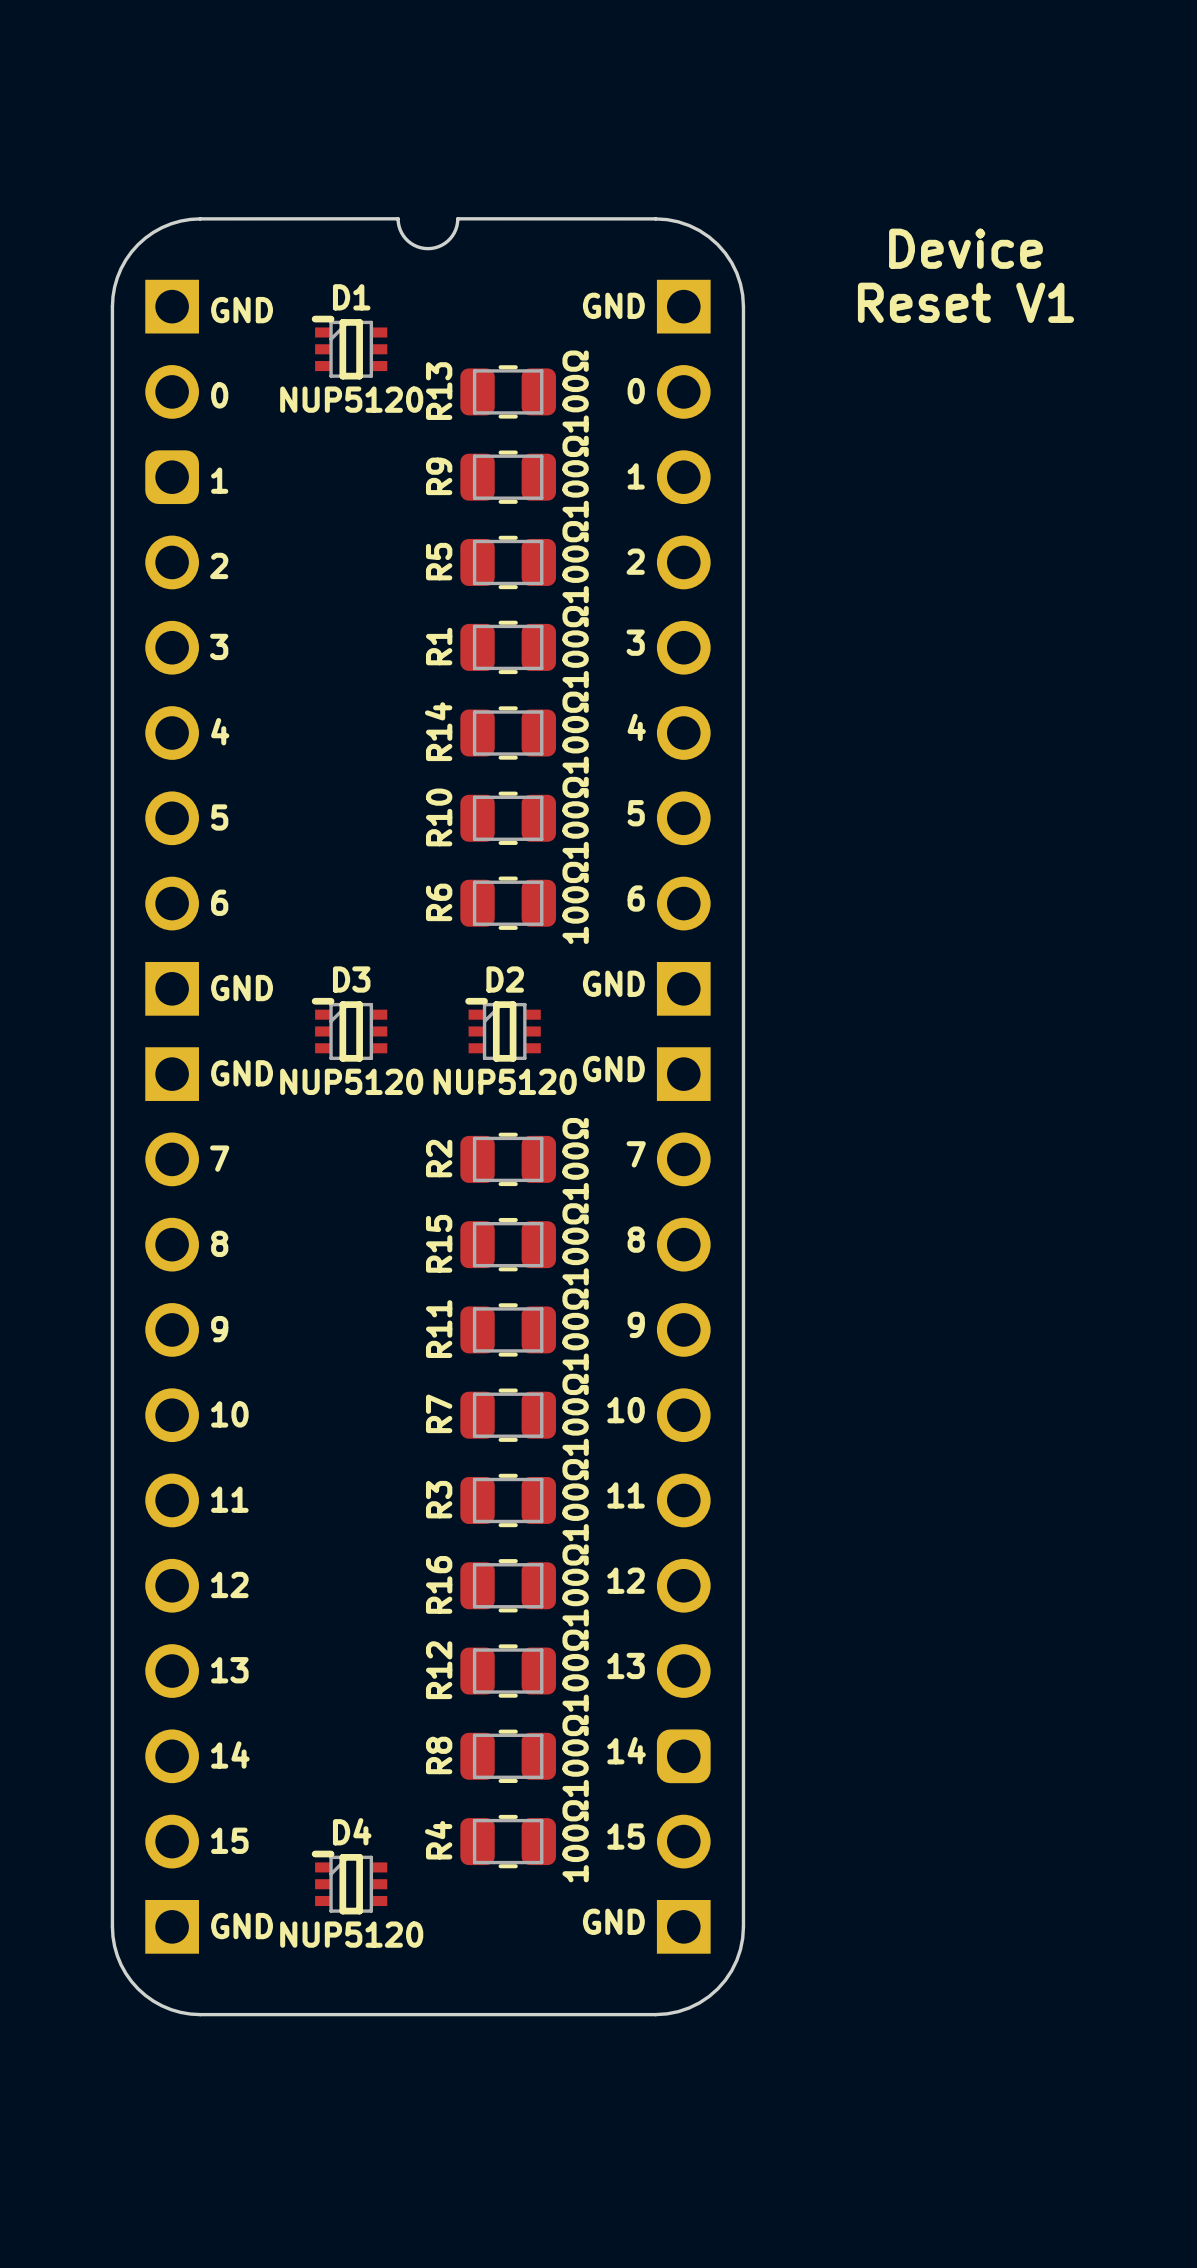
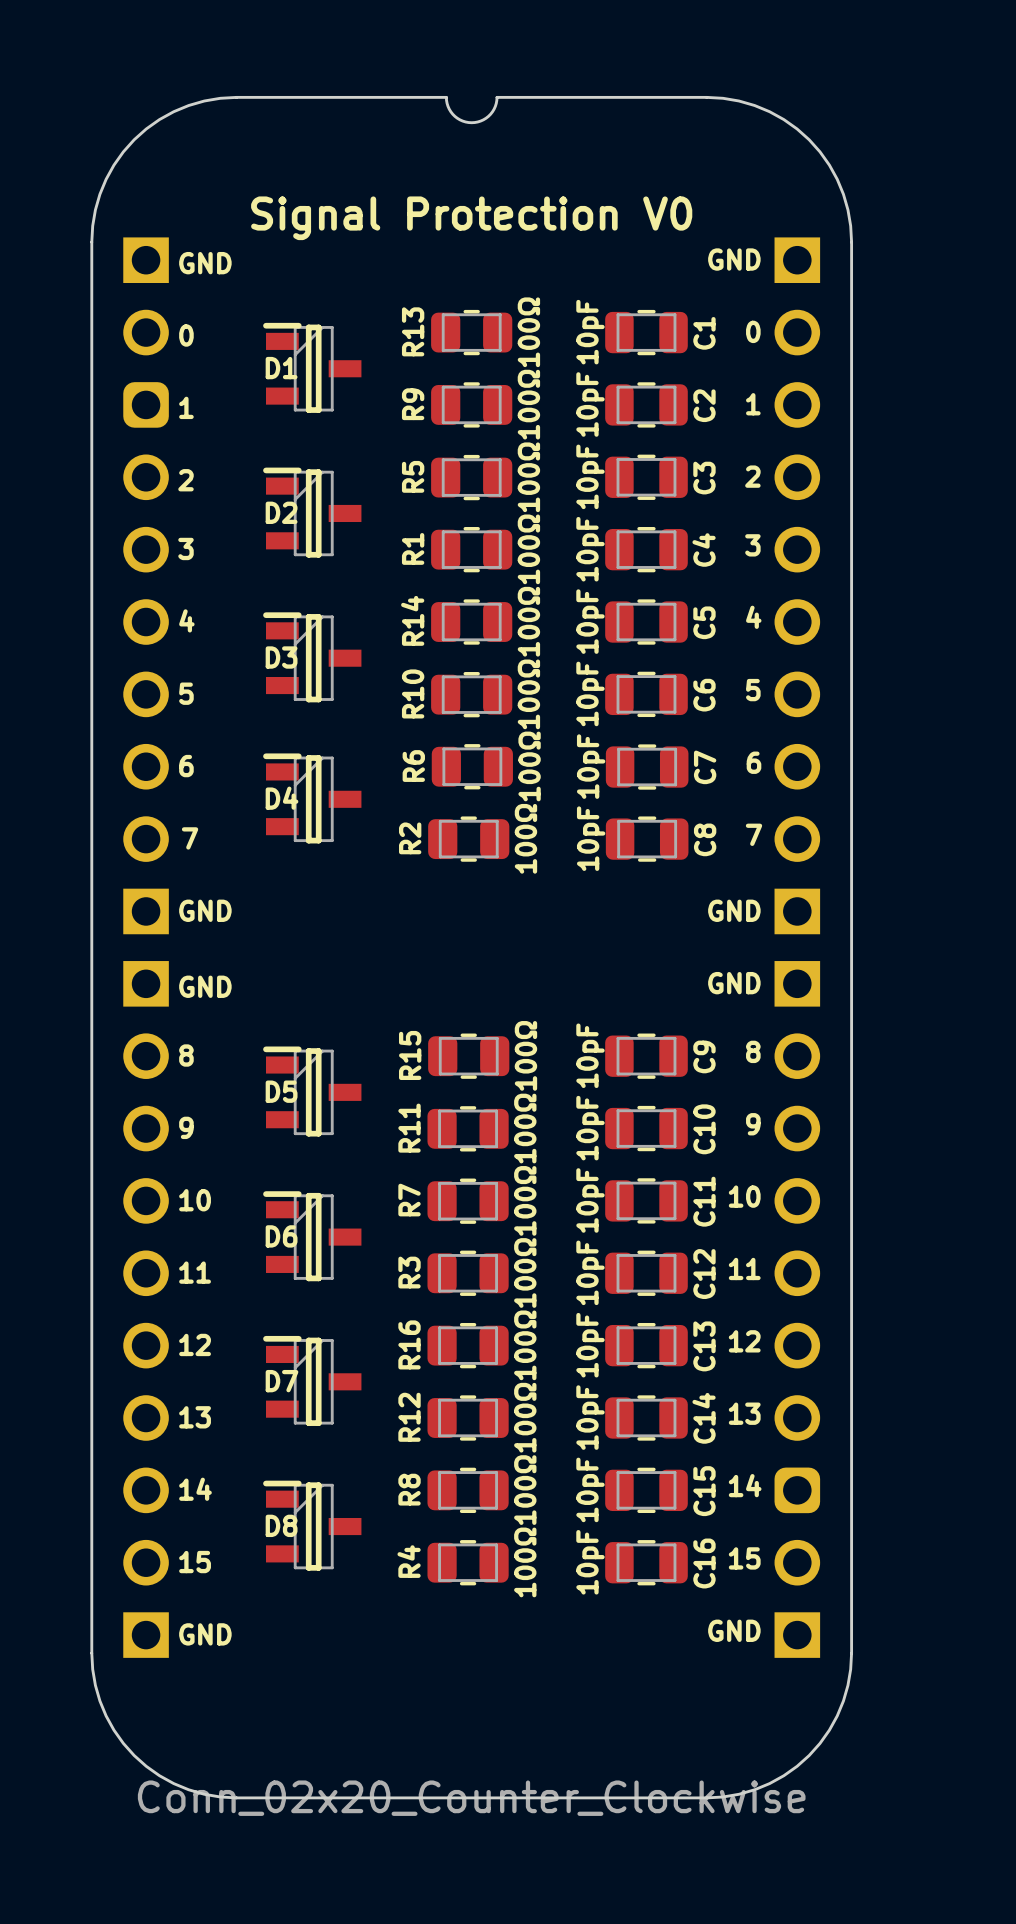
text: Device (965, 248) -> none
text: none -> Signal Protection V0 (471, 218)
text: Reset V1 (965, 302) -> none
text position: GND (613, 305) -> GND (734, 259)
D1 footprint: [311, 315, 388, 380] -> [263, 322, 362, 413]
R13 position: (508, 391) -> (471, 332)
text position: 0 (636, 391) -> 0 (753, 331)
C1: none -> 10pF (646, 332)
D1 text: NUP5120 (351, 399) -> none
text position: 1 (636, 476) -> 1 (753, 404)
R9 position: (508, 477) -> (471, 404)
C2: none -> 10pF (646, 404)
text position: 2 (635, 561) -> 2 (752, 476)
R5 position: (508, 562) -> (471, 477)
C3: none -> 10pF (646, 477)
text position: 3 (635, 642) -> 3 (752, 545)
R1 position: (508, 647) -> (471, 549)
C4: none -> 10pF (646, 549)
text position: 4 (636, 727) -> 4 (753, 617)
R14 position: (508, 733) -> (471, 622)
C5: none -> 10pF (646, 622)
text position: 5 (636, 813) -> 5 (753, 690)
R10 position: (508, 818) -> (471, 694)
C6: none -> 10pF (646, 694)
text position: 6 (636, 898) -> 6 (754, 762)
R6 position: (508, 903) -> (472, 766)
C7: none -> 10pF (647, 767)
text: GND (613, 983) -> none
text: none -> 7 (754, 834)
text position: GND (242, 988) -> GND (205, 986)
C8: none -> 10pF (647, 839)
D3 footprint: [311, 997, 388, 1062] -> [263, 612, 362, 703]
D2 footprint: [465, 997, 541, 1062] -> [263, 467, 362, 558]
text: GND (613, 1069) -> none
text: none -> GND (734, 910)
D3 text: NUP5120 (351, 1081) -> none
D2 text: NUP5120 (505, 1081) -> none
part: (427, 1116) -> none
part: none -> Conn_02x20_Counter_Clockwise (471, 947)
text: 7 (636, 1154) -> none
text position: 7 (219, 1158) -> 7 (190, 838)
text: none -> GND (734, 983)
R2 position: (508, 1159) -> (468, 839)
text position: 8 (636, 1239) -> 8 (753, 1051)
R15 position: (508, 1244) -> (468, 1056)
C9: none -> 10pF (646, 1056)
D5: none -> (312, 1091)
text position: 9 (636, 1324) -> 9 (753, 1124)
R11 position: (508, 1329) -> (468, 1128)
C10: none -> 10pF (646, 1128)
text position: 10 (626, 1410) -> 10 (744, 1196)
R7 position: (508, 1415) -> (468, 1201)
C11: none -> 10pF (646, 1200)
D6: none -> (312, 1236)
text position: 11 (626, 1495) -> 11 (744, 1268)
R3 position: (508, 1500) -> (468, 1273)
C12: none -> 10pF (646, 1273)
text position: 12 (626, 1580) -> 12 (744, 1341)
R16 position: (508, 1585) -> (468, 1345)
C13: none -> 10pF (646, 1345)
D7: none -> (312, 1380)
text position: 13 (626, 1665) -> 13 (744, 1413)
R12 position: (508, 1671) -> (468, 1417)
C14: none -> 10pF (646, 1417)
text position: 14 (626, 1750) -> 14 (745, 1485)
R8 position: (508, 1756) -> (468, 1490)
C15: none -> 10pF (646, 1490)
D8: none -> (312, 1525)
text position: 15 (626, 1836) -> 15 (744, 1558)
R4 position: (508, 1841) -> (468, 1562)
C16: none -> 10pF (646, 1562)
D4 footprint: [311, 1850, 388, 1915] -> [263, 753, 362, 844]
text position: GND (613, 1921) -> GND (734, 1630)
D4 text: NUP5120 (351, 1934) -> none

